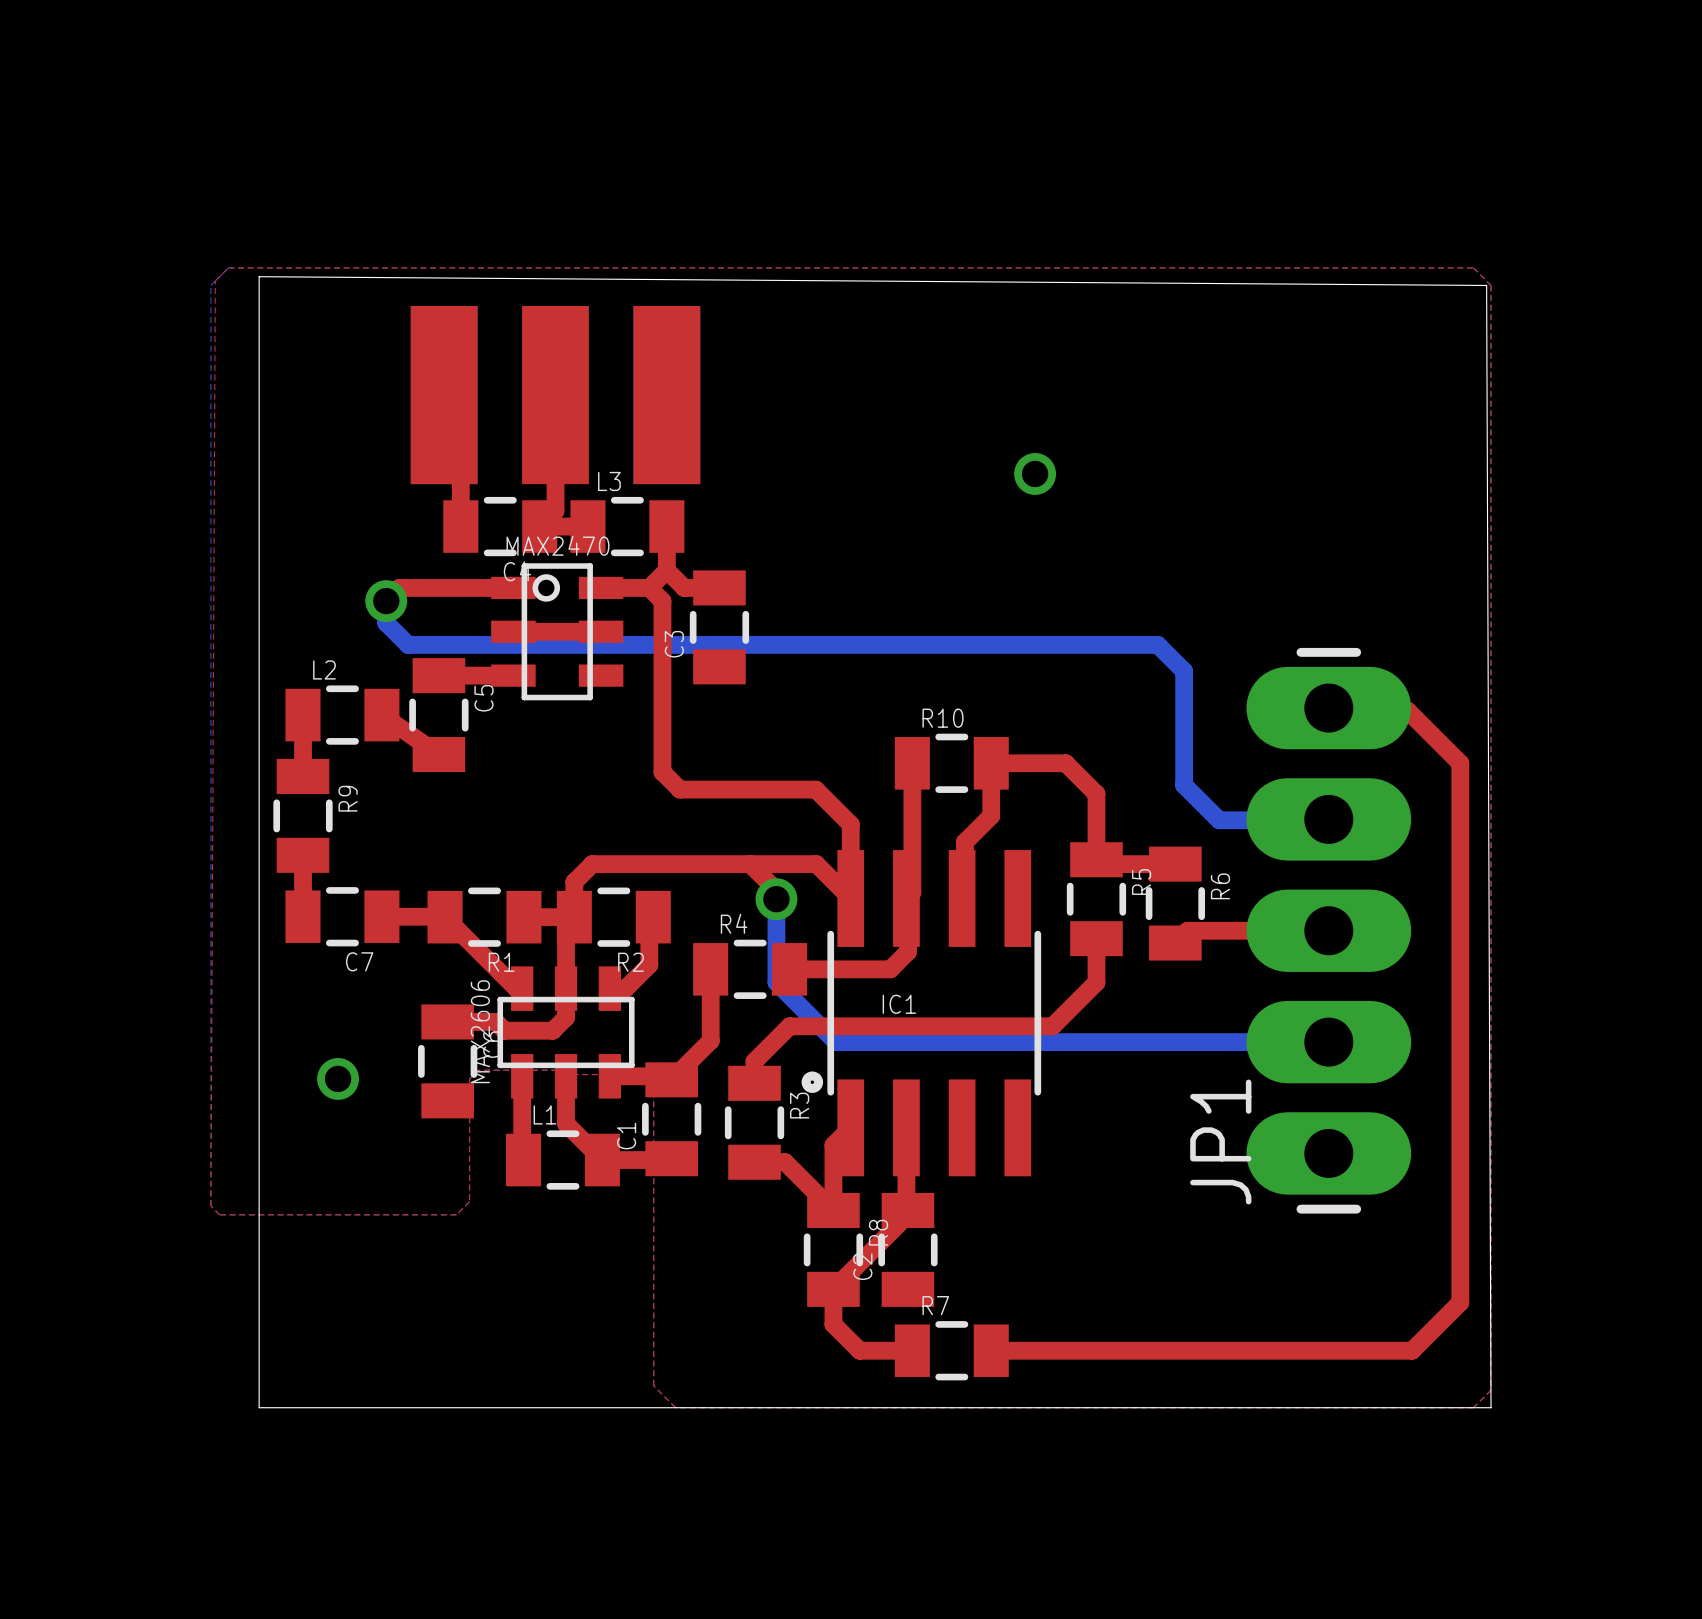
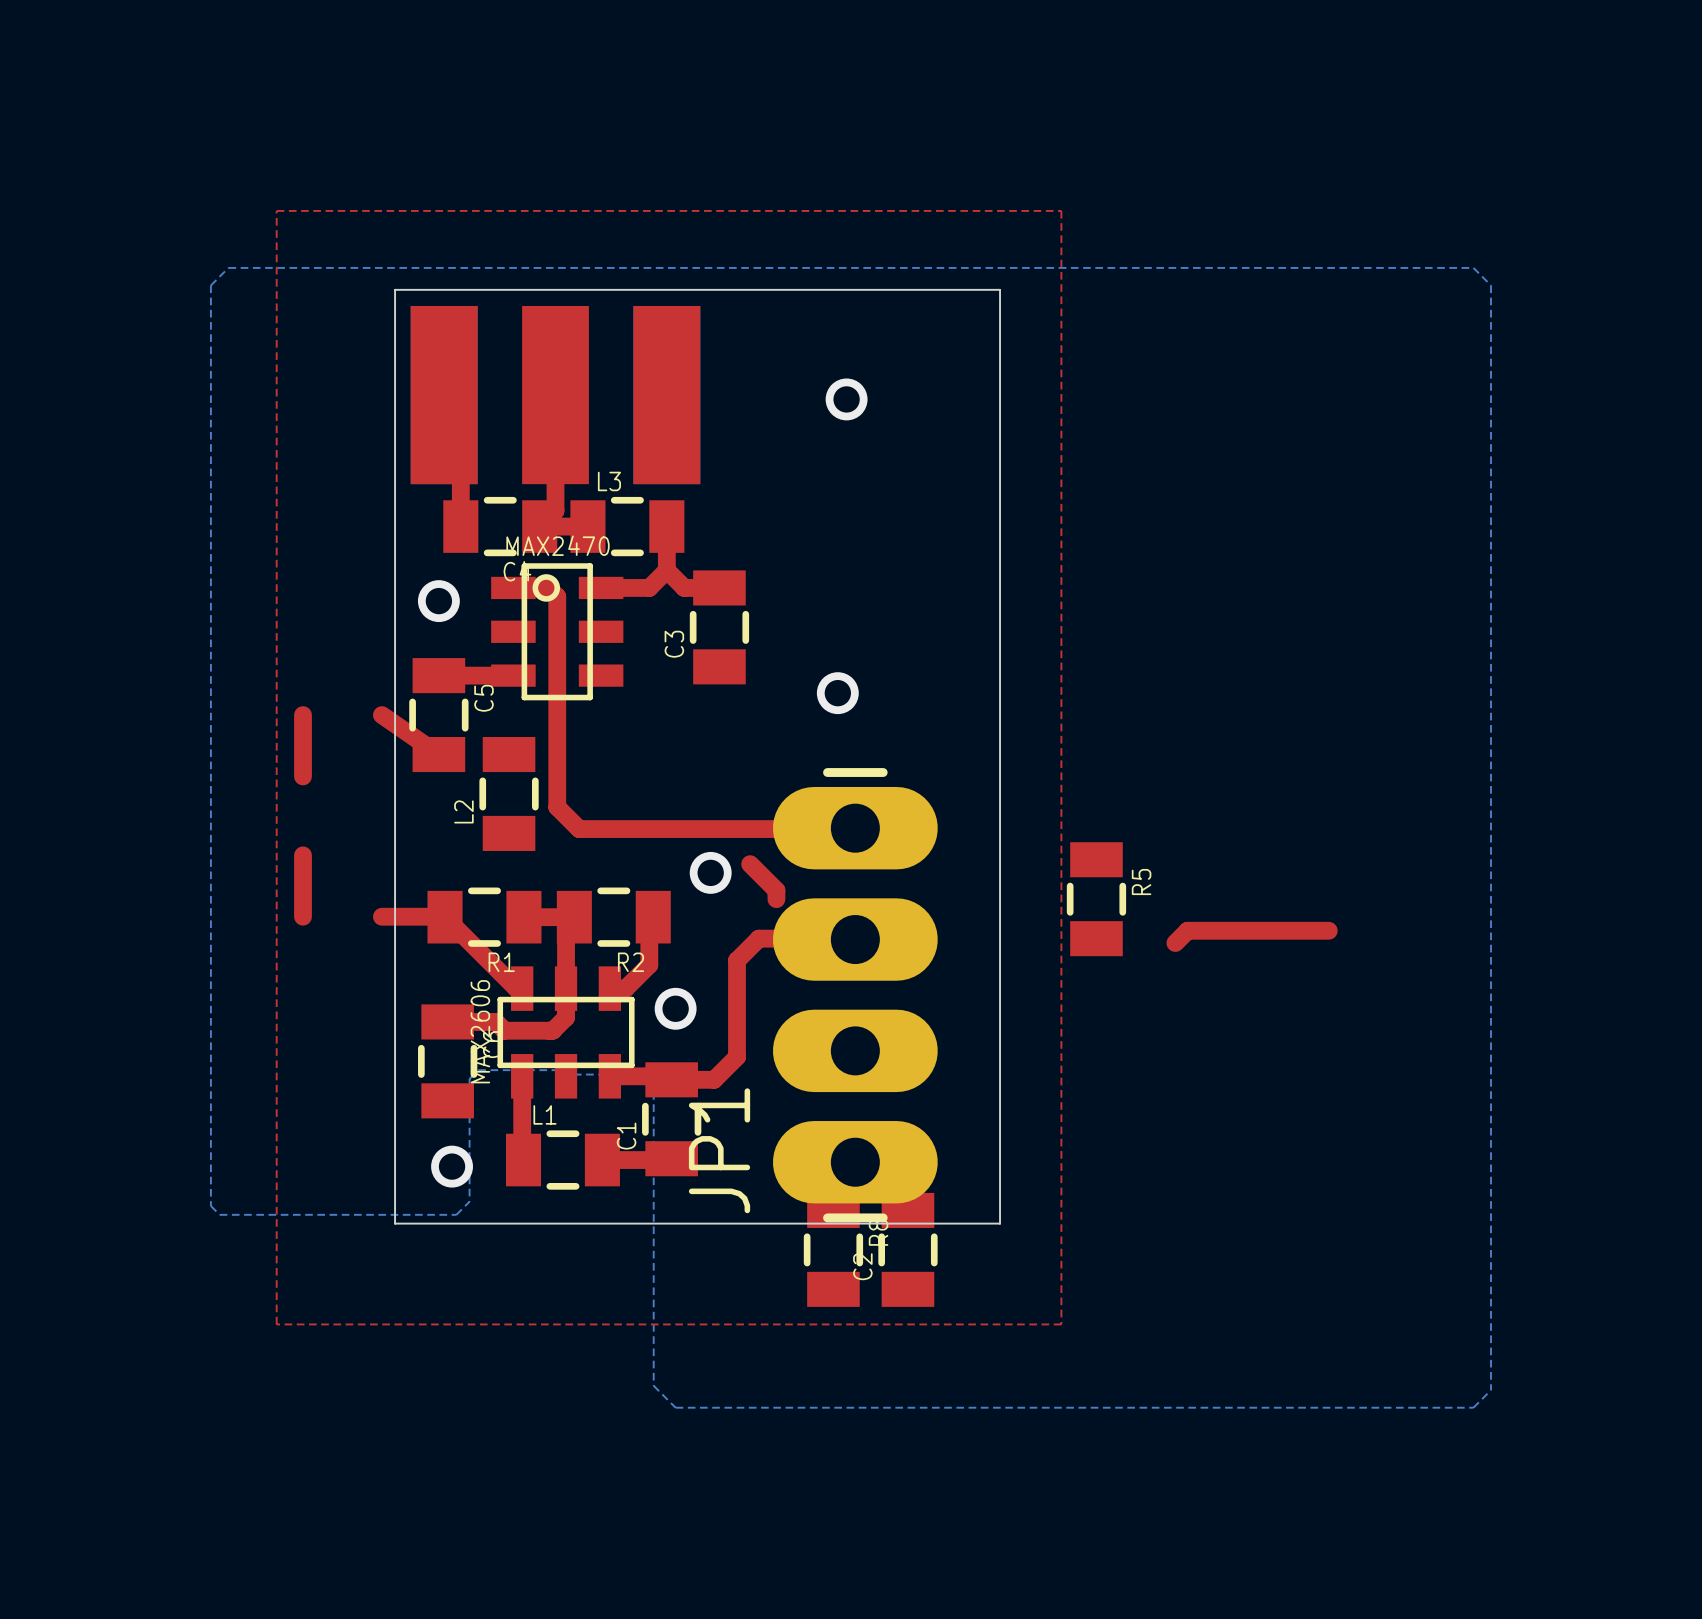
top zone outline: (228, 267) (215, 281) (210, 1206) (219, 1214) (456, 1214) (469, 1201) (469, 1078) (478, 1070) (557, 1070) (561, 1074) (636, 1074) (653, 1092) (653, 1385) (675, 1407) (1473, 1407) (1491, 1390) (1491, 285) (1473, 267) (228, 267) -> (276, 210) (276, 1324) (1061, 1324) (1061, 210) (276, 210)
board edge: (259, 276) (1486, 285) (1491, 1407) (259, 1407) (259, 276) -> none
board edge: none -> (395, 289) (1000, 289) (1000, 1223) (395, 1223) (395, 289)
via: none -> (846, 399)
via: (1035, 473) -> none
top track: (513, 587) (399, 587) (386, 601) -> (513, 587) (548, 587) (557, 596) (557, 807) (579, 829) (855, 828)
top track: (649, 587) (662, 601) (662, 772) (680, 789) (815, 789) (850, 824) (850, 898) (816, 864) (592, 864) (574, 882) (574, 917) -> none
bottom track: (386, 601) (386, 623) (408, 644) (1157, 644) (1184, 671) (1184, 785) (1219, 820) (1328, 819) -> none
via position: (386, 601) -> (438, 601)
top track: (513, 631) (601, 631) -> none
JP1 footprint: [1246, 647, 1412, 1214] -> [772, 768, 938, 1223]
via: none -> (837, 693)
top track: (1328, 708) (1331, 710) (1407, 710) (1460, 763) (1460, 1302) (1412, 1350) (991, 1350) -> none
L2 rotation: 0° (342, 715) -> 90° clockwise (509, 793)
L2 position: (342, 715) -> (509, 793)
top track: (912, 763) (912, 892) (906, 898) (907, 951) (890, 969) (789, 969) -> none
R10: (951, 763) -> none
R9: (302, 815) -> none
top track: (1175, 864) (1100, 864) (1096, 859) (1096, 793) (1065, 763) (991, 763) (991, 815) (964, 842) (964, 895) (962, 898) -> none
bottom track: (776, 899) (776, 982) (836, 1042) (1328, 1042) -> none
via position: (776, 899) -> (710, 872)
R6: (1175, 903) -> none
C7: (342, 916) -> none
top track: (1096, 938) (1096, 982) (1052, 1026) (789, 1026) (754, 1061) (754, 1083) -> none
top track: (710, 969) (710, 1040) (671, 1079) -> (855, 939) (758, 938) (736, 960) (736, 1057) (714, 1079) (671, 1079)
R4: (750, 969) -> none
via: none -> (675, 1008)
IC1: (921, 1013) -> none
top track: (566, 1076) (566, 1123) (602, 1160) -> none
via position: (338, 1078) -> (452, 1166)
R3: (754, 1122) -> none
top track: (850, 1127) (833, 1145) (833, 1210) (785, 1162) (754, 1162) -> none
top track: (906, 1127) (907, 1214) (833, 1289) (833, 1324) (859, 1350) (912, 1350) -> none
R7: (951, 1350) -> none

